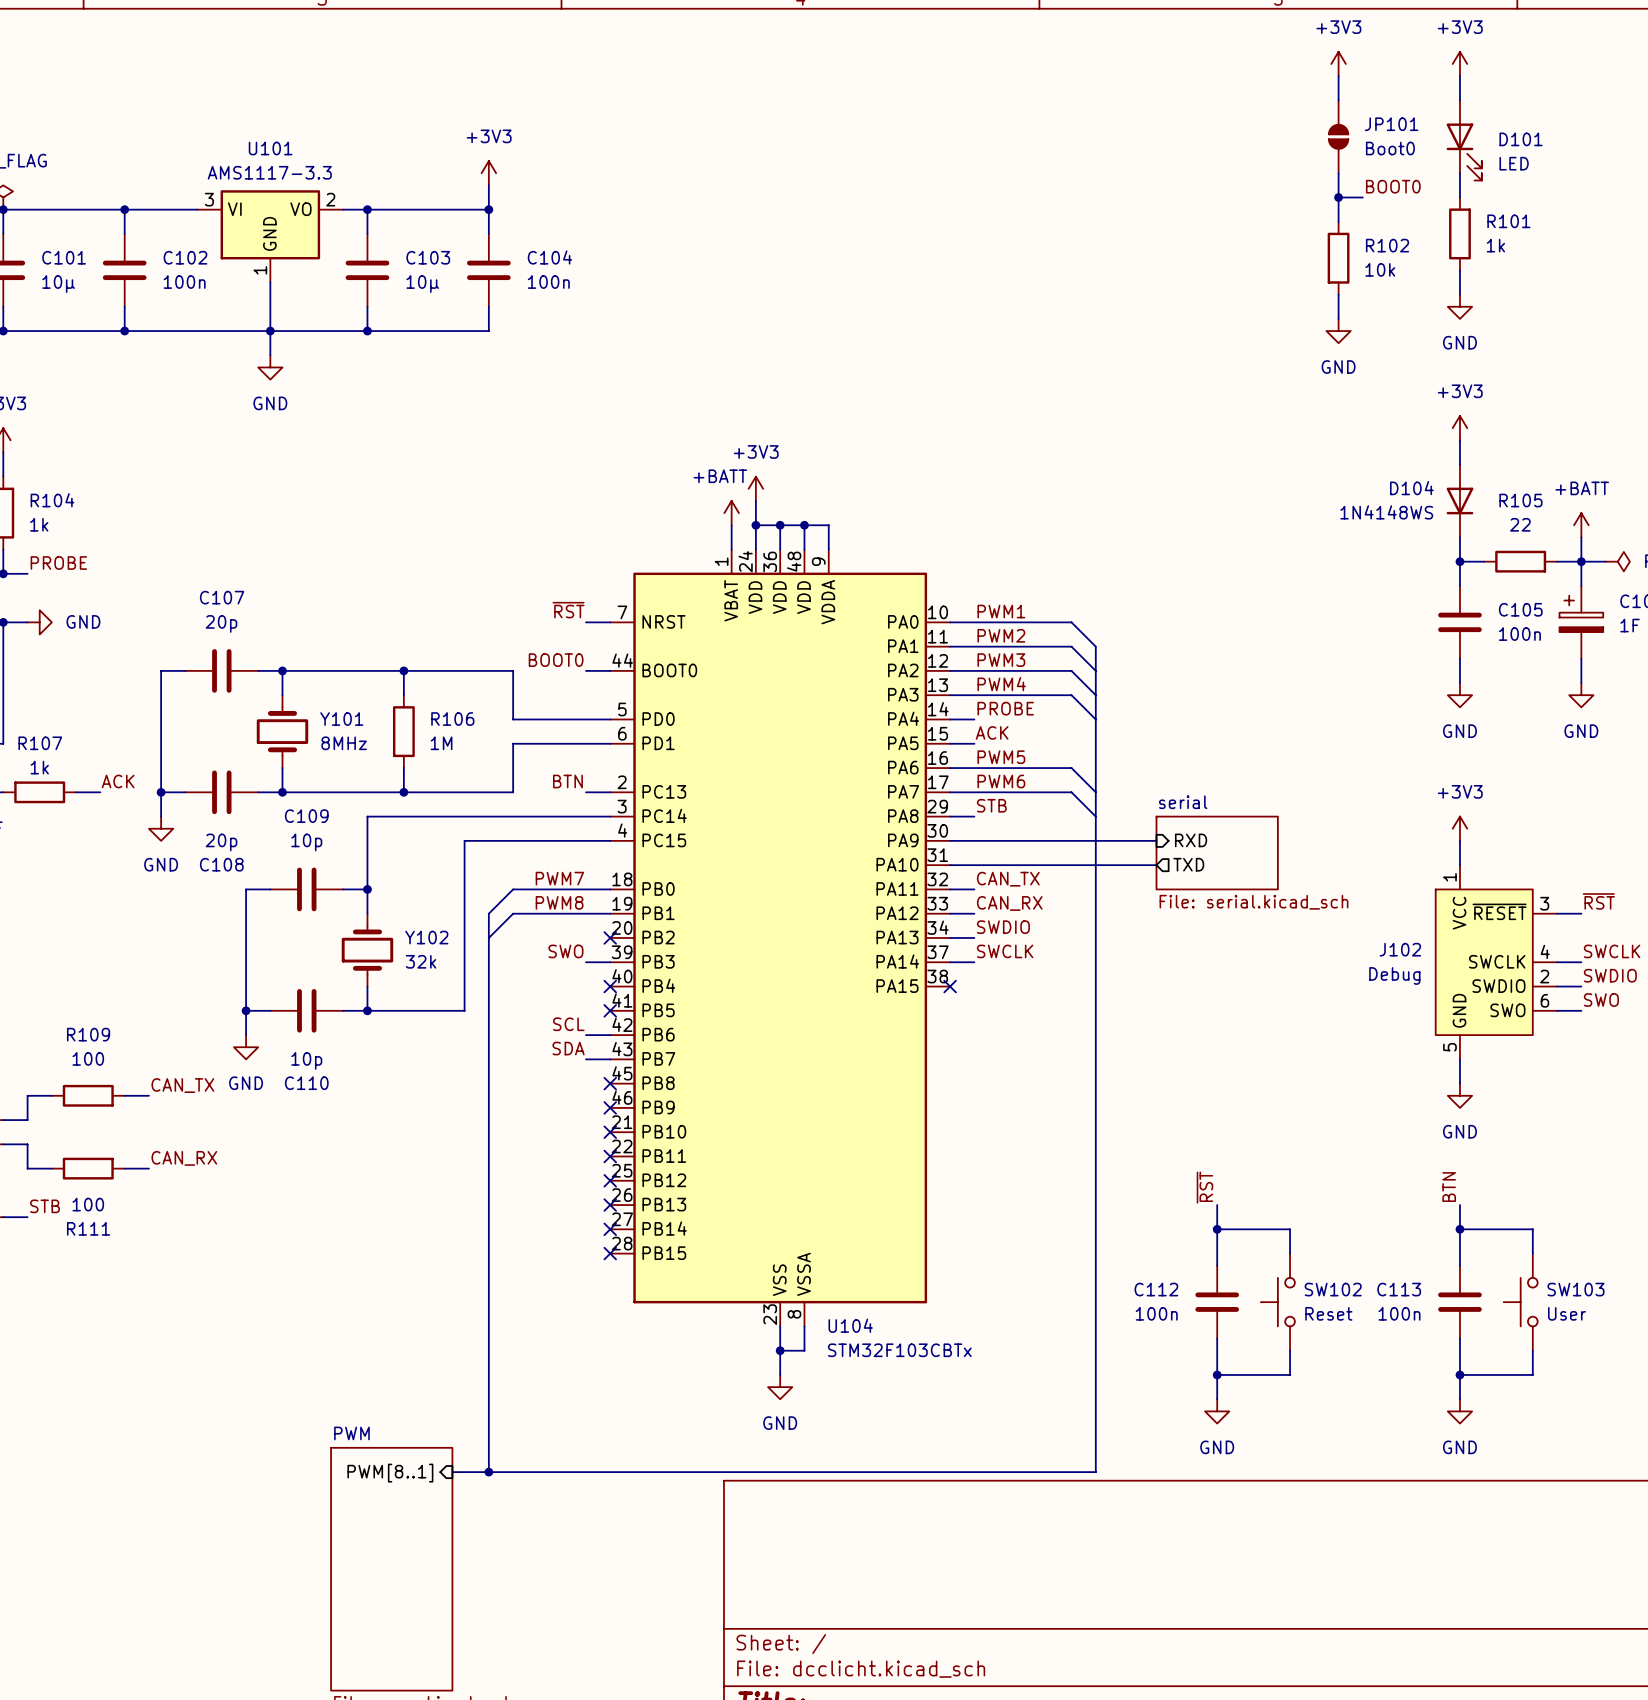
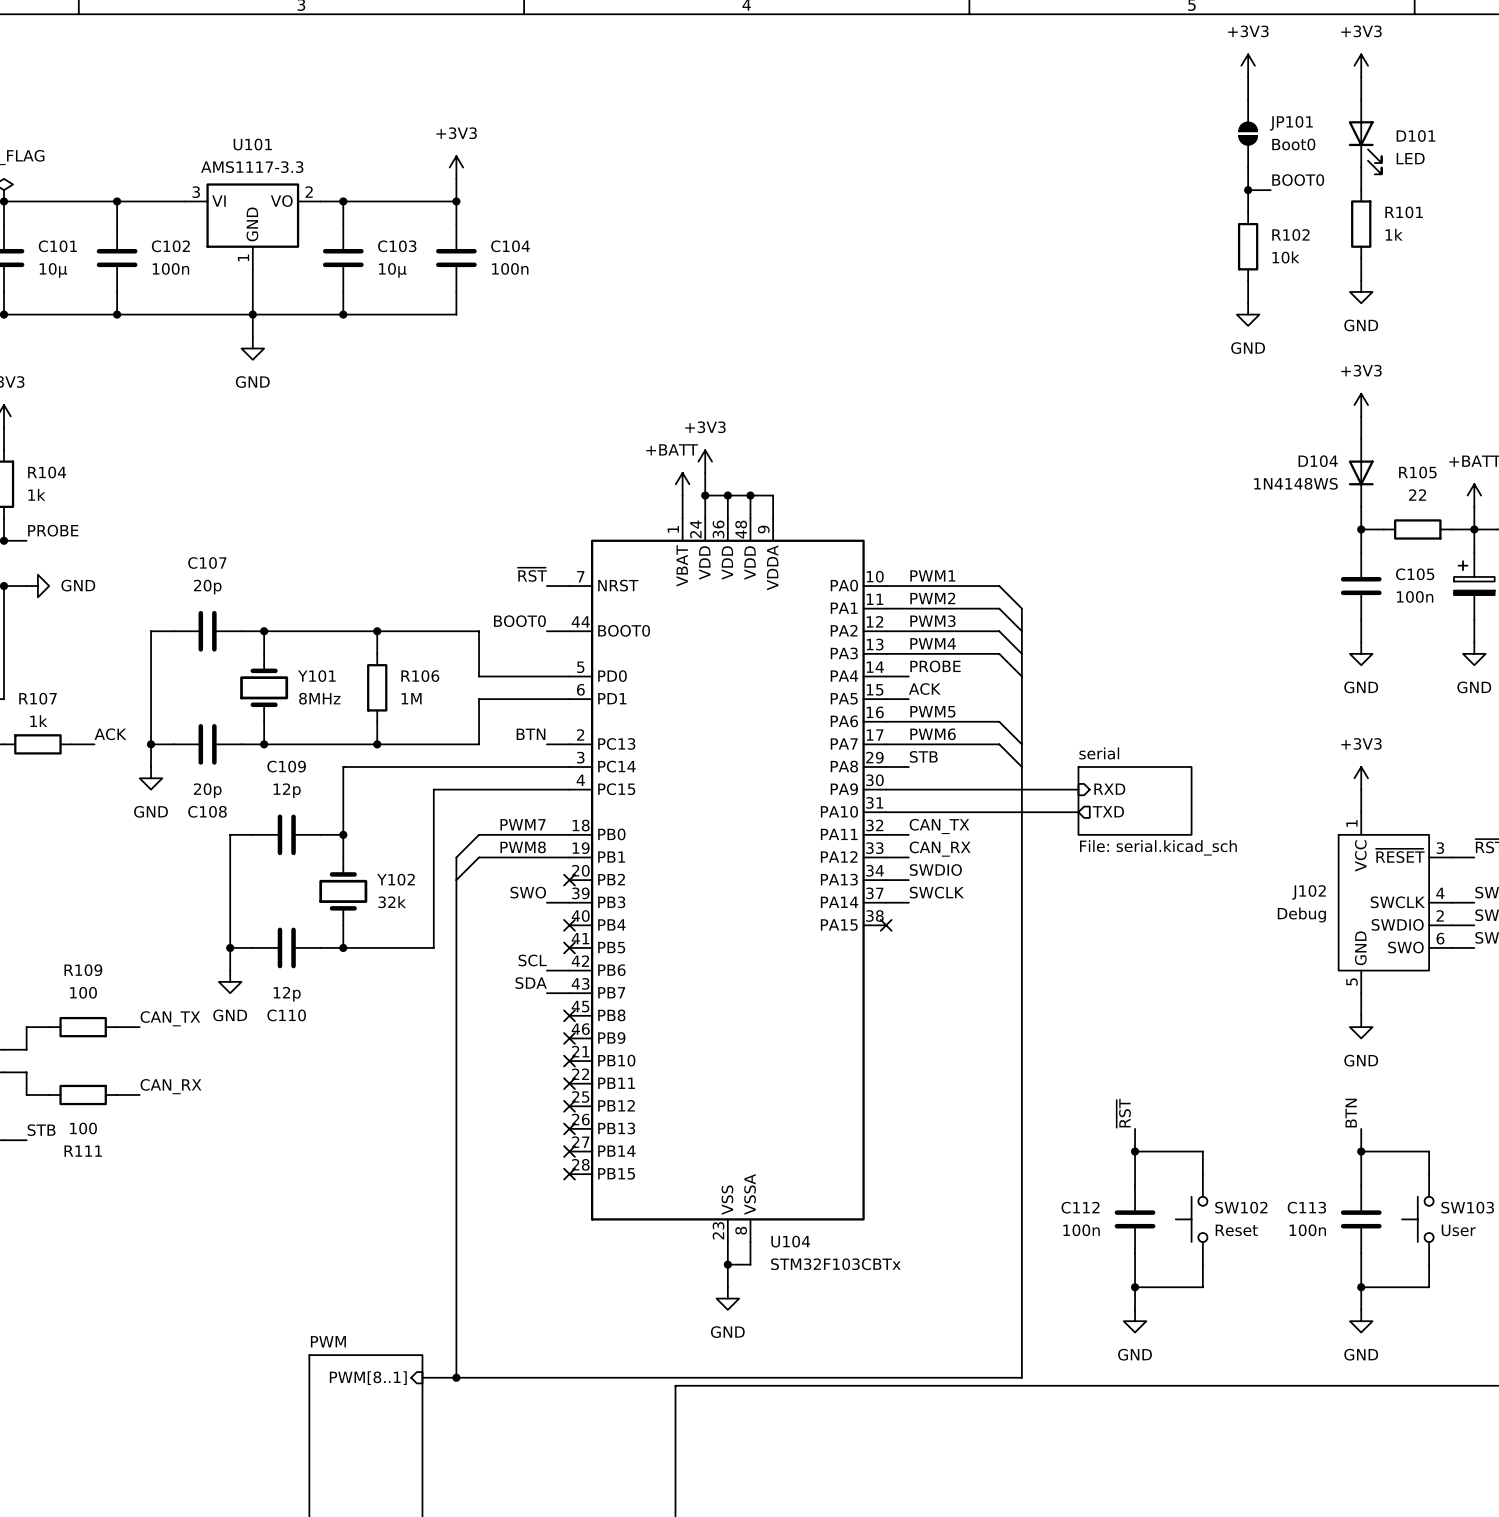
C109 value: 10p (306, 842) -> 12p (287, 790)
C110 value: 10p (306, 1060) -> 12p (287, 994)

